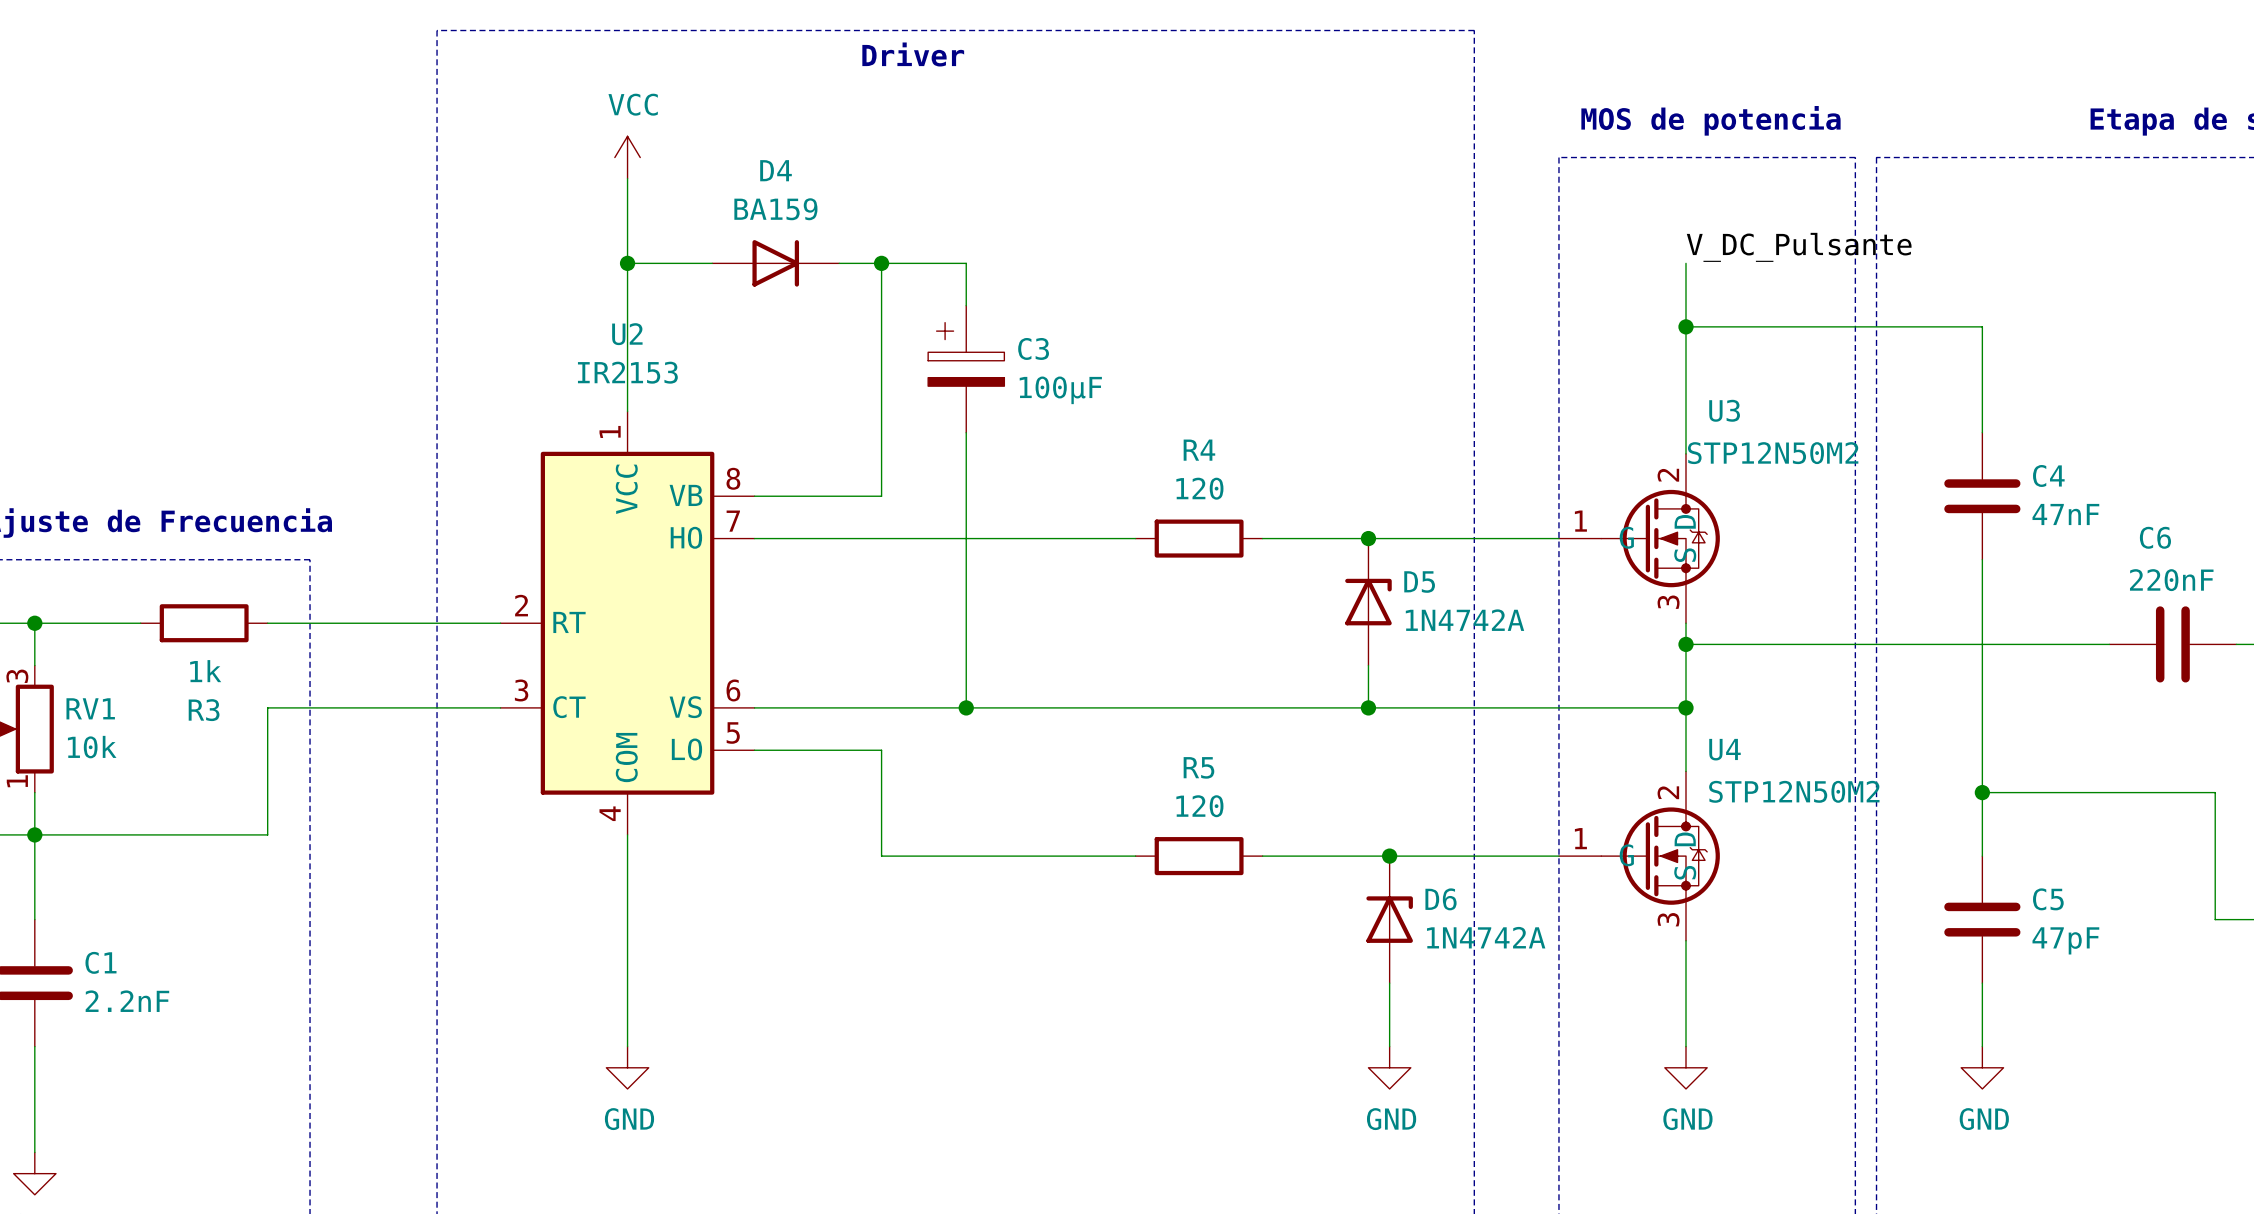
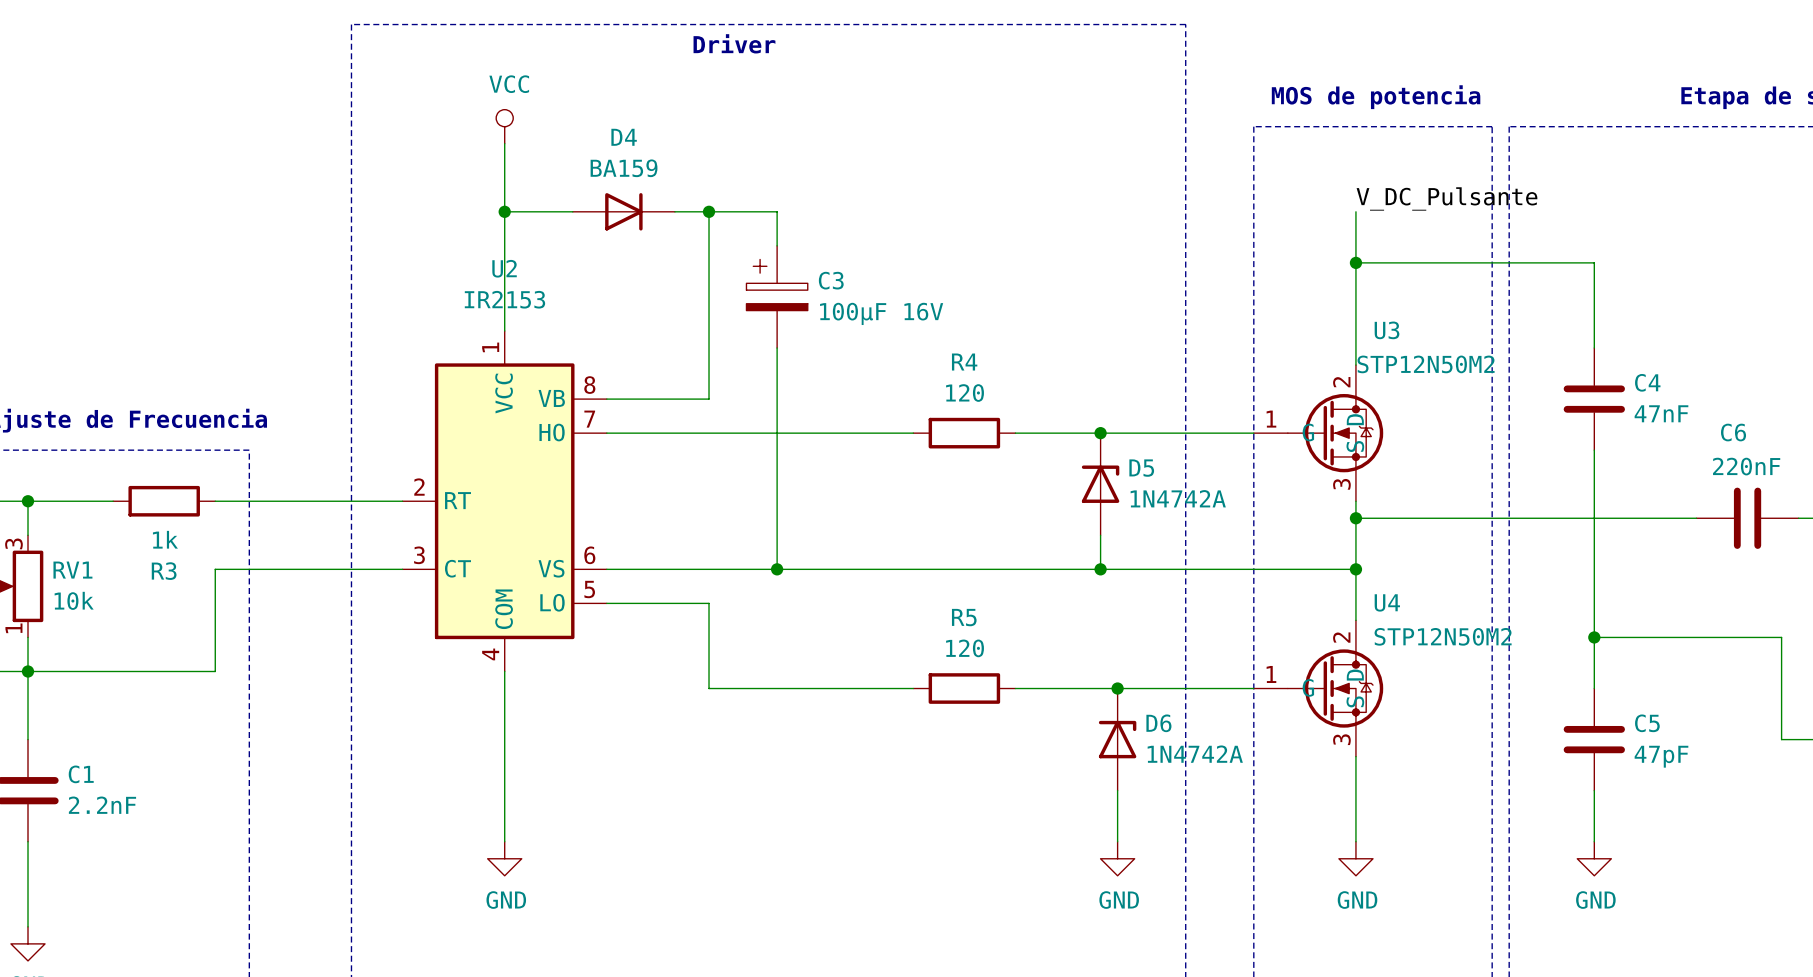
power symbol shape: [614, 136, 641, 179] -> [496, 109, 514, 144]
C3 value: 100µF (1060, 390) -> 100µF 16V (881, 313)

